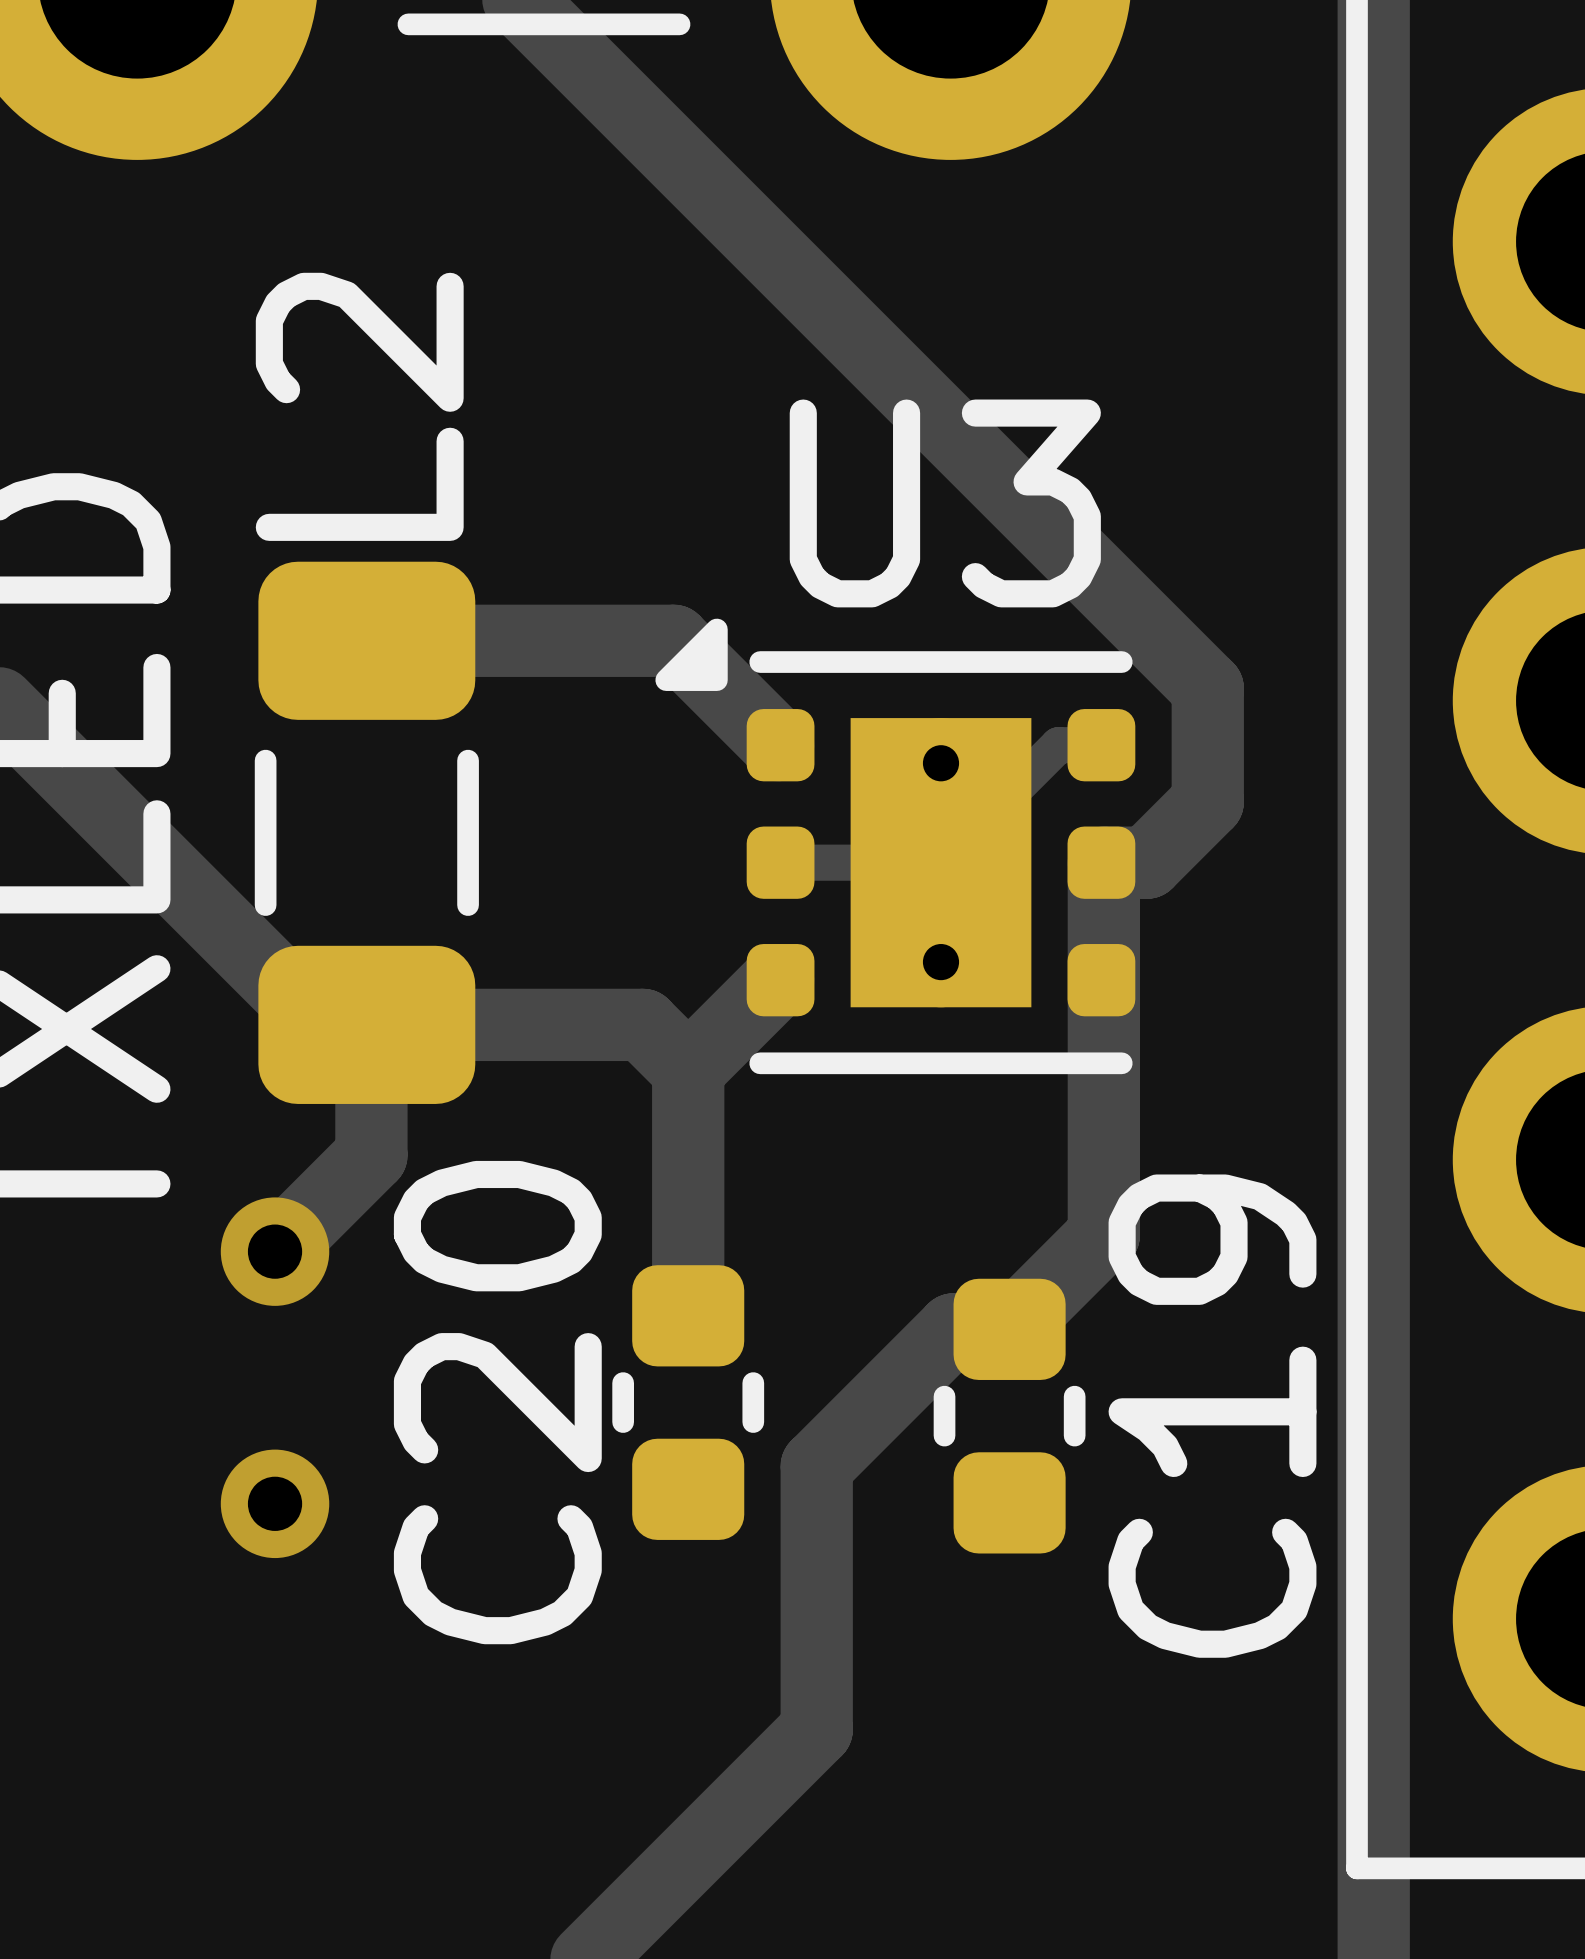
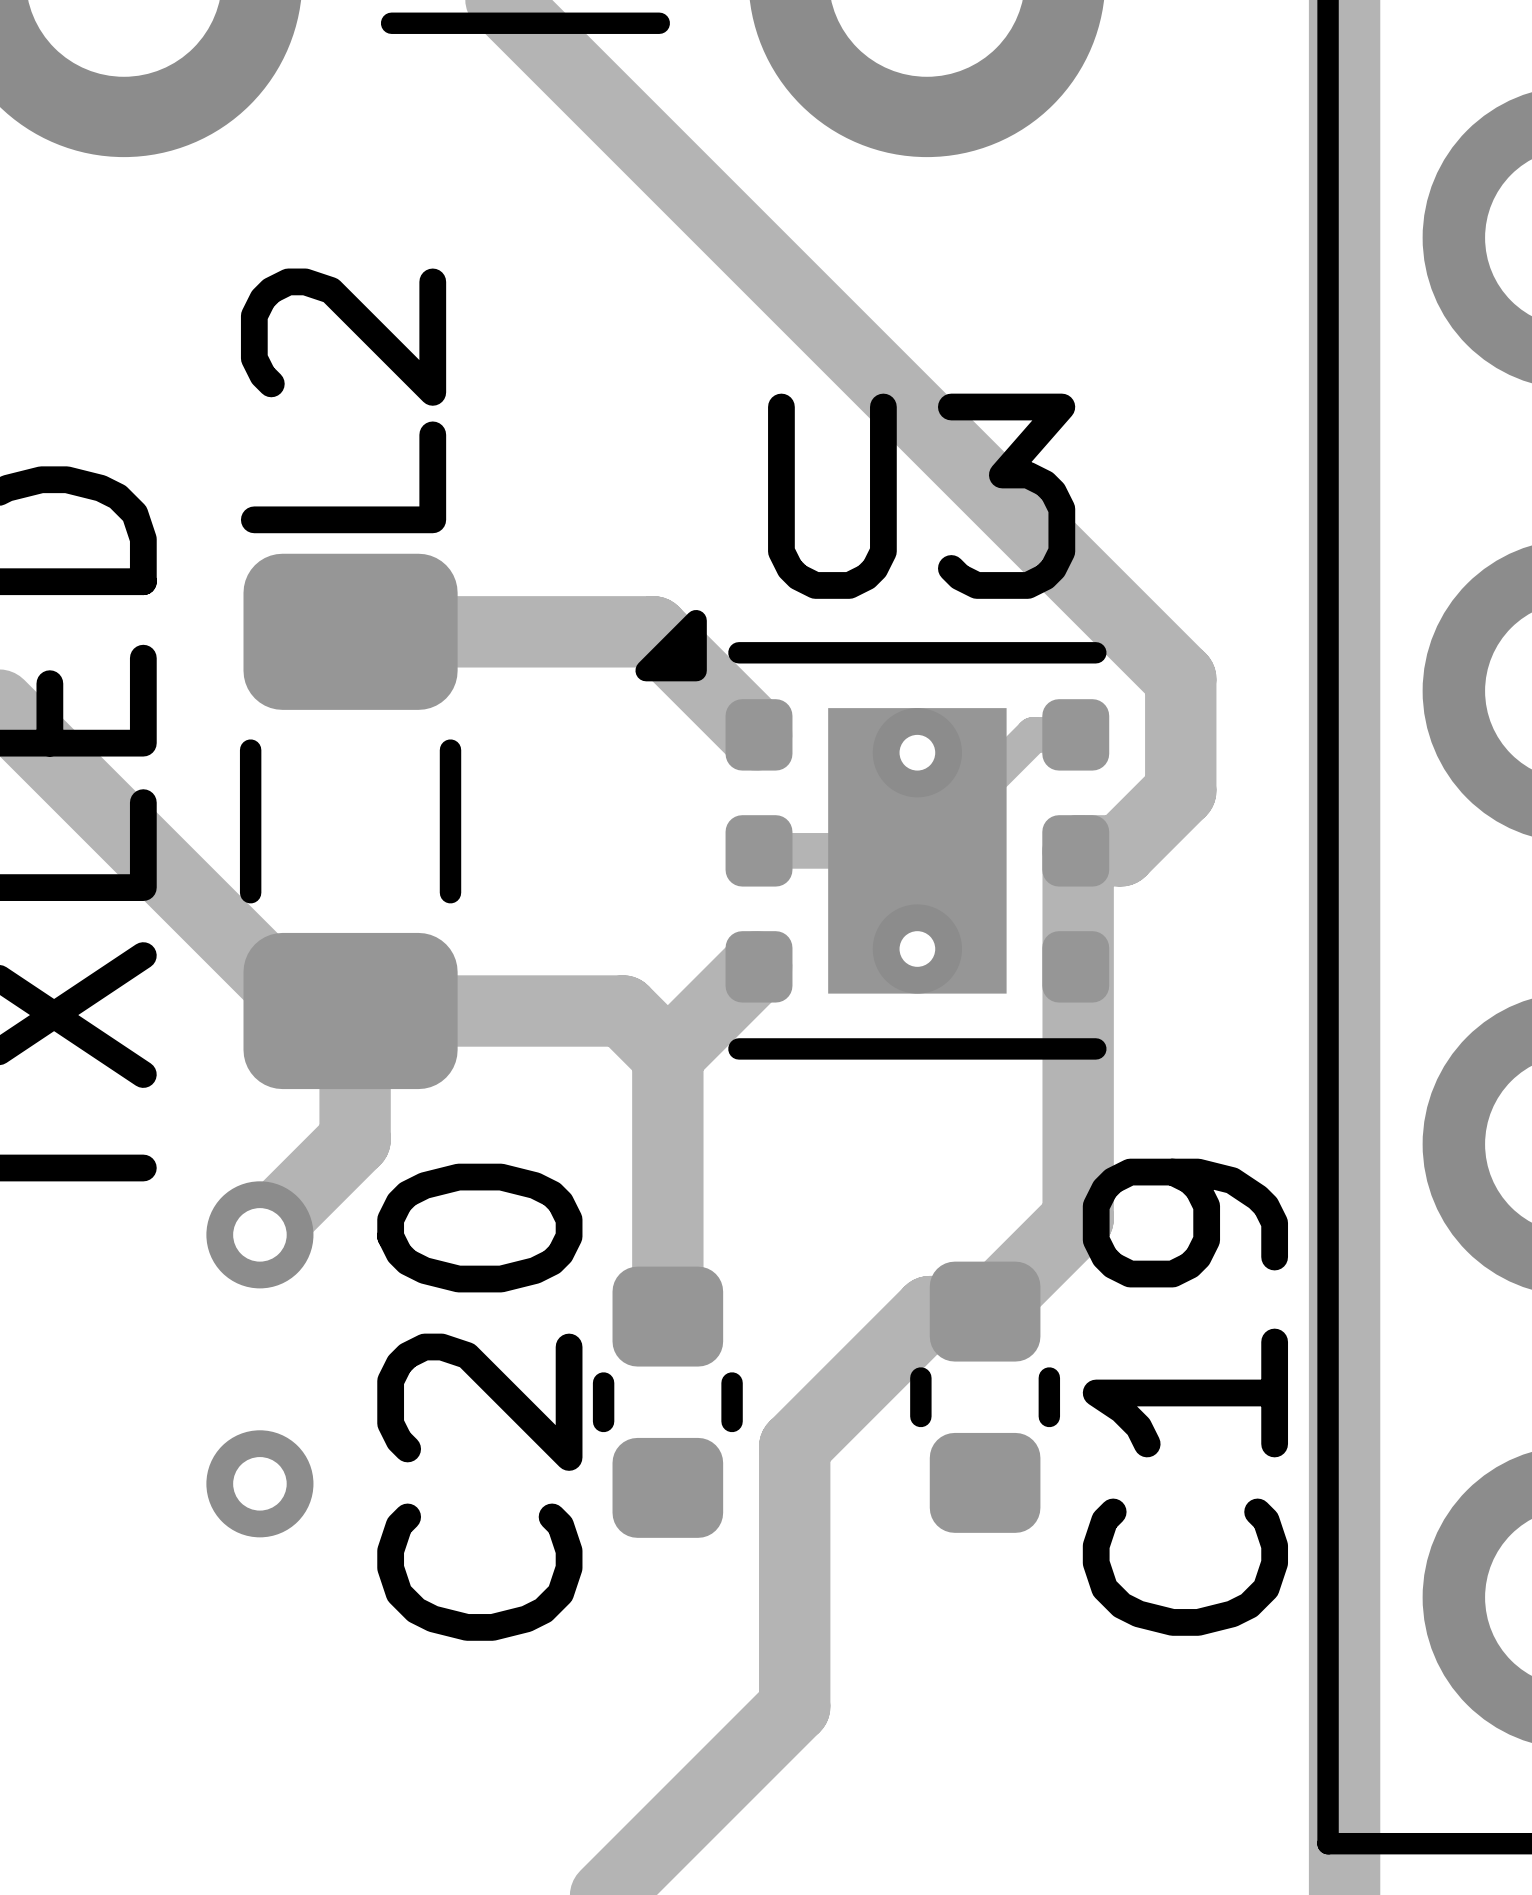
C20 position: (688, 1402) -> (667, 1402)

